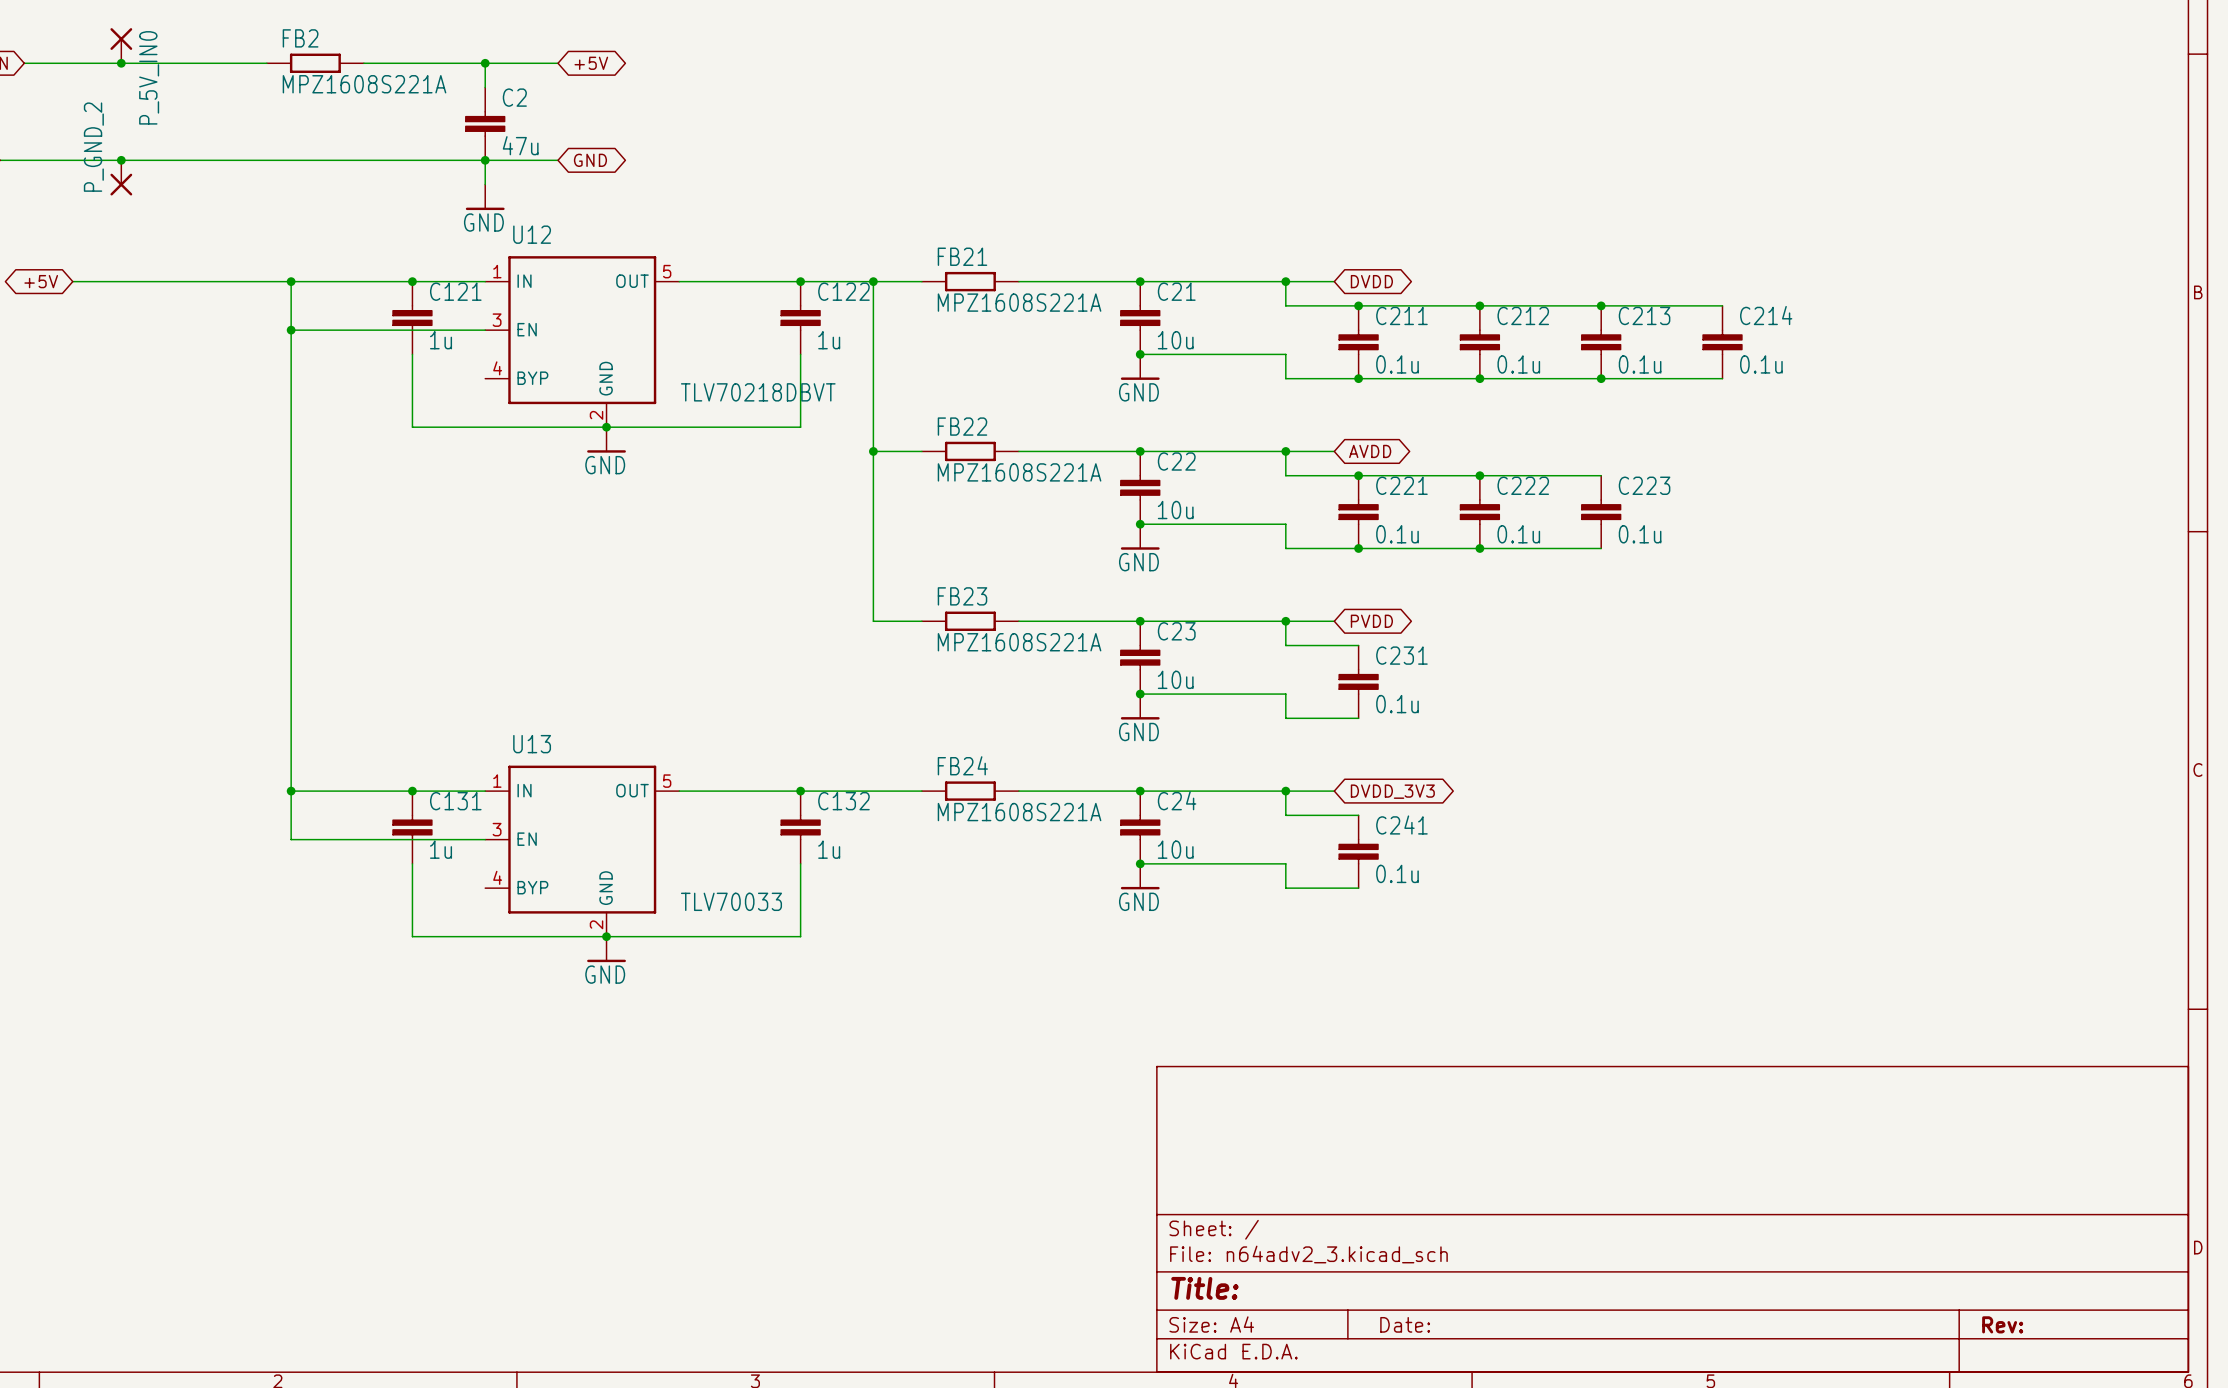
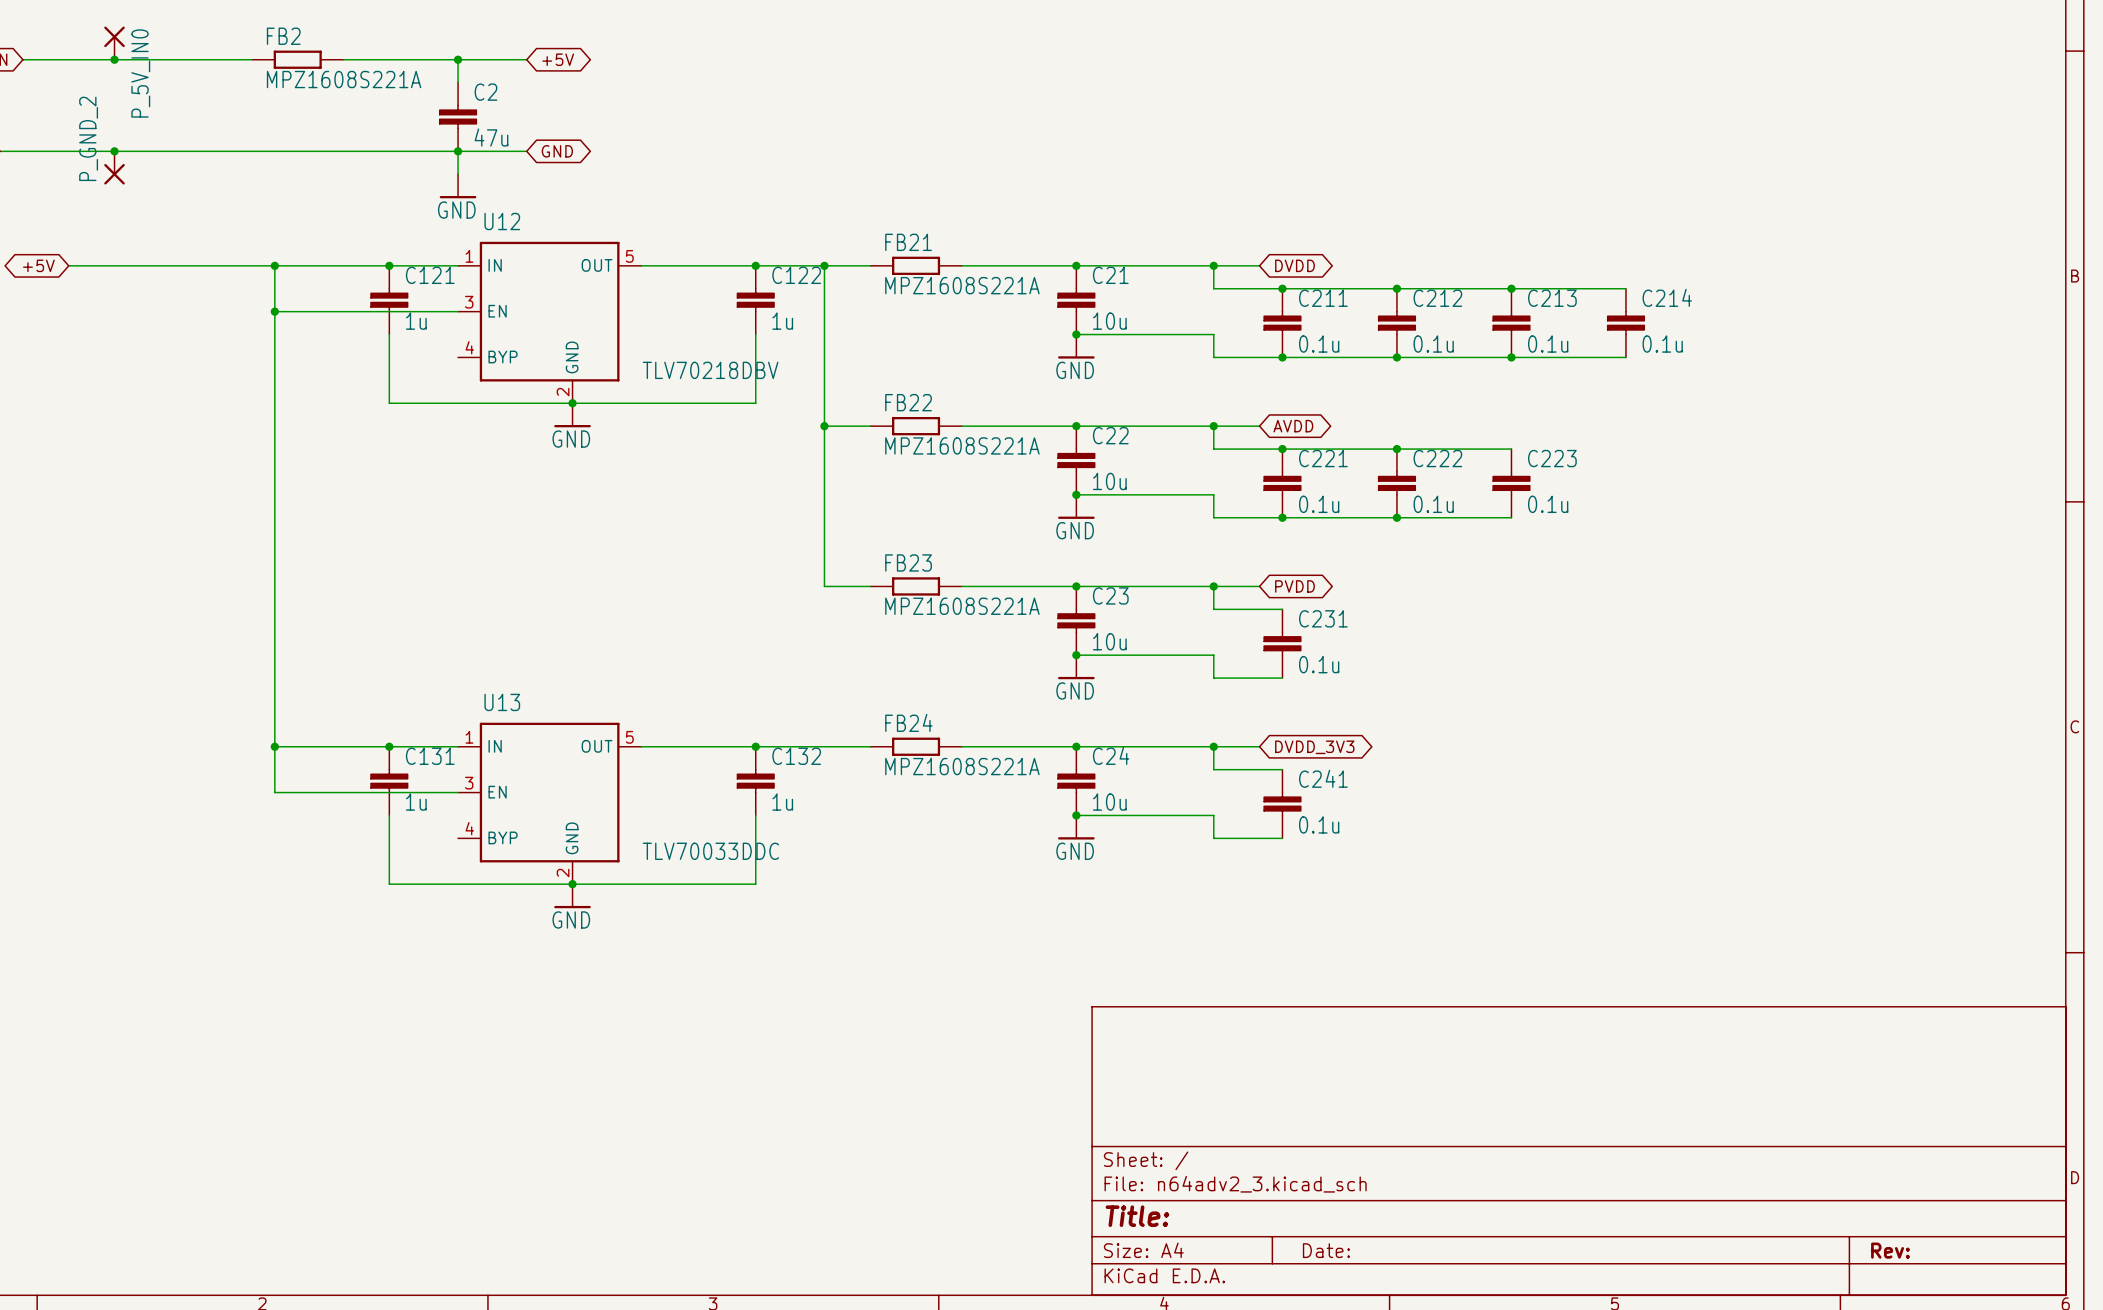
U12 value: TLV70218DBVT (758, 392) -> TLV70218DBV (710, 370)
U13 value: TLV70033 (731, 901) -> TLV70033DDC (710, 851)

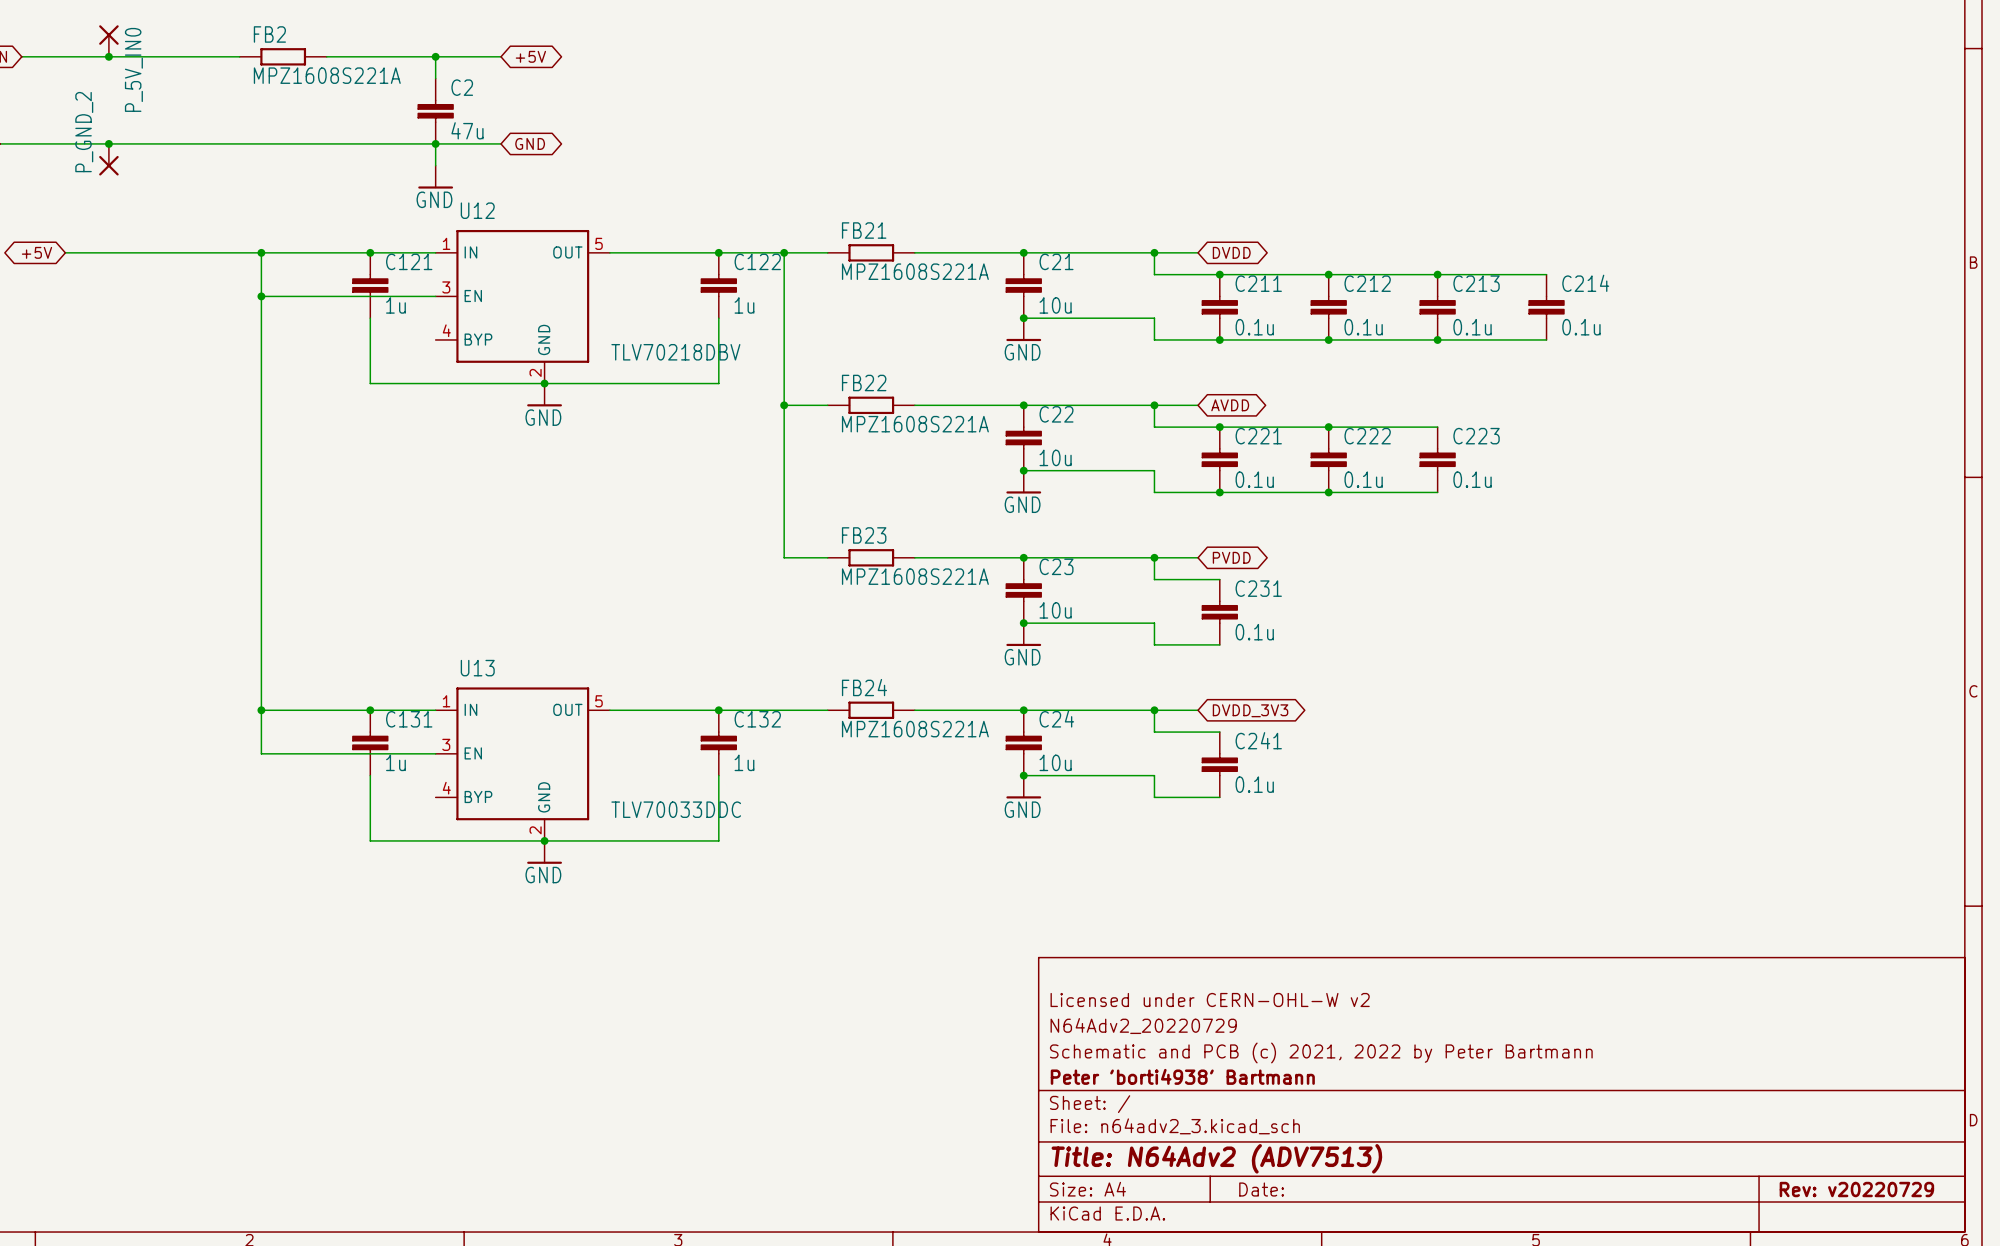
title block: none -> Licensed under CERN-OHL-W v2 (1210, 999)
title block: none -> N64Adv2_20220729 (1143, 1026)
title block: none -> Schematic and PCB (c) 2021, 2022 by Peter Bartmann (1321, 1052)
title block: none -> Peter 'borti4938' Bartmann (1182, 1076)
title block: Title: (1137, 1216) -> Title: N64Adv2 (ADV7513) (1216, 1158)
title block: Rev: (1890, 1250) -> Rev: v20220729 (1856, 1189)

